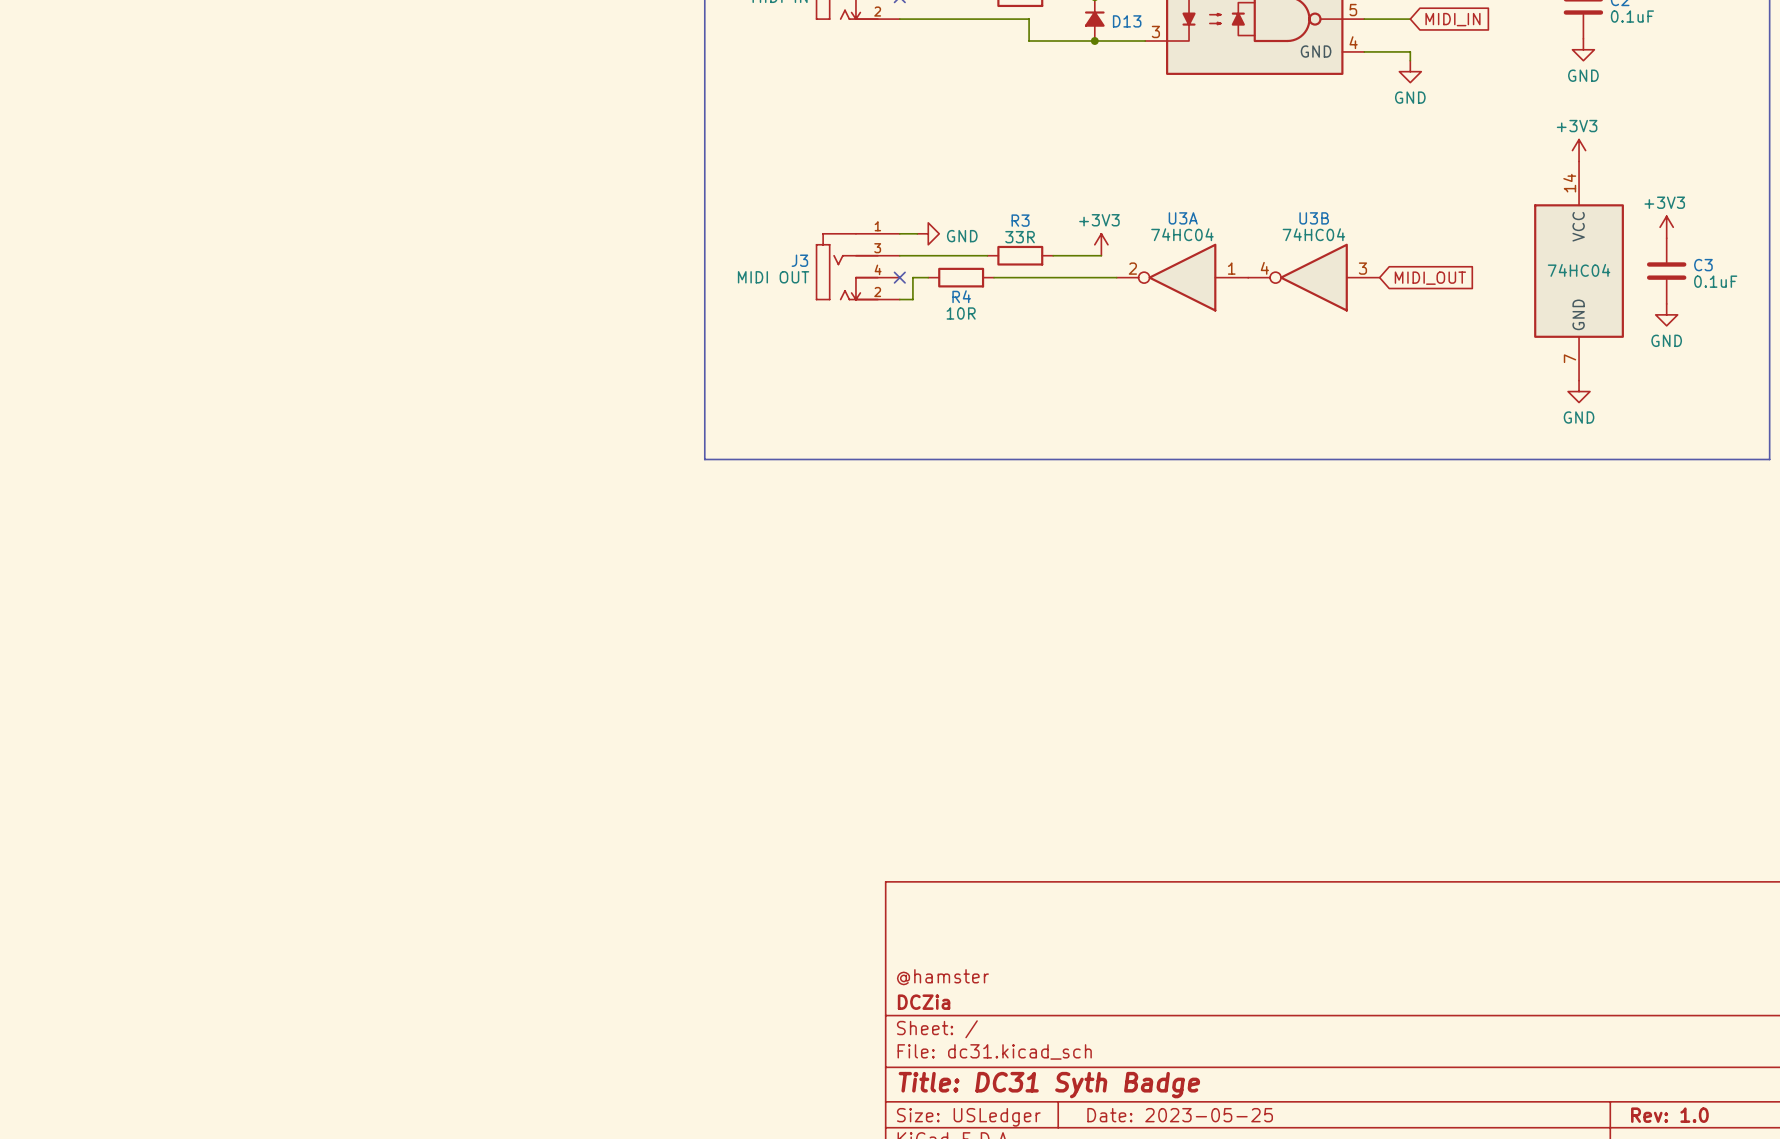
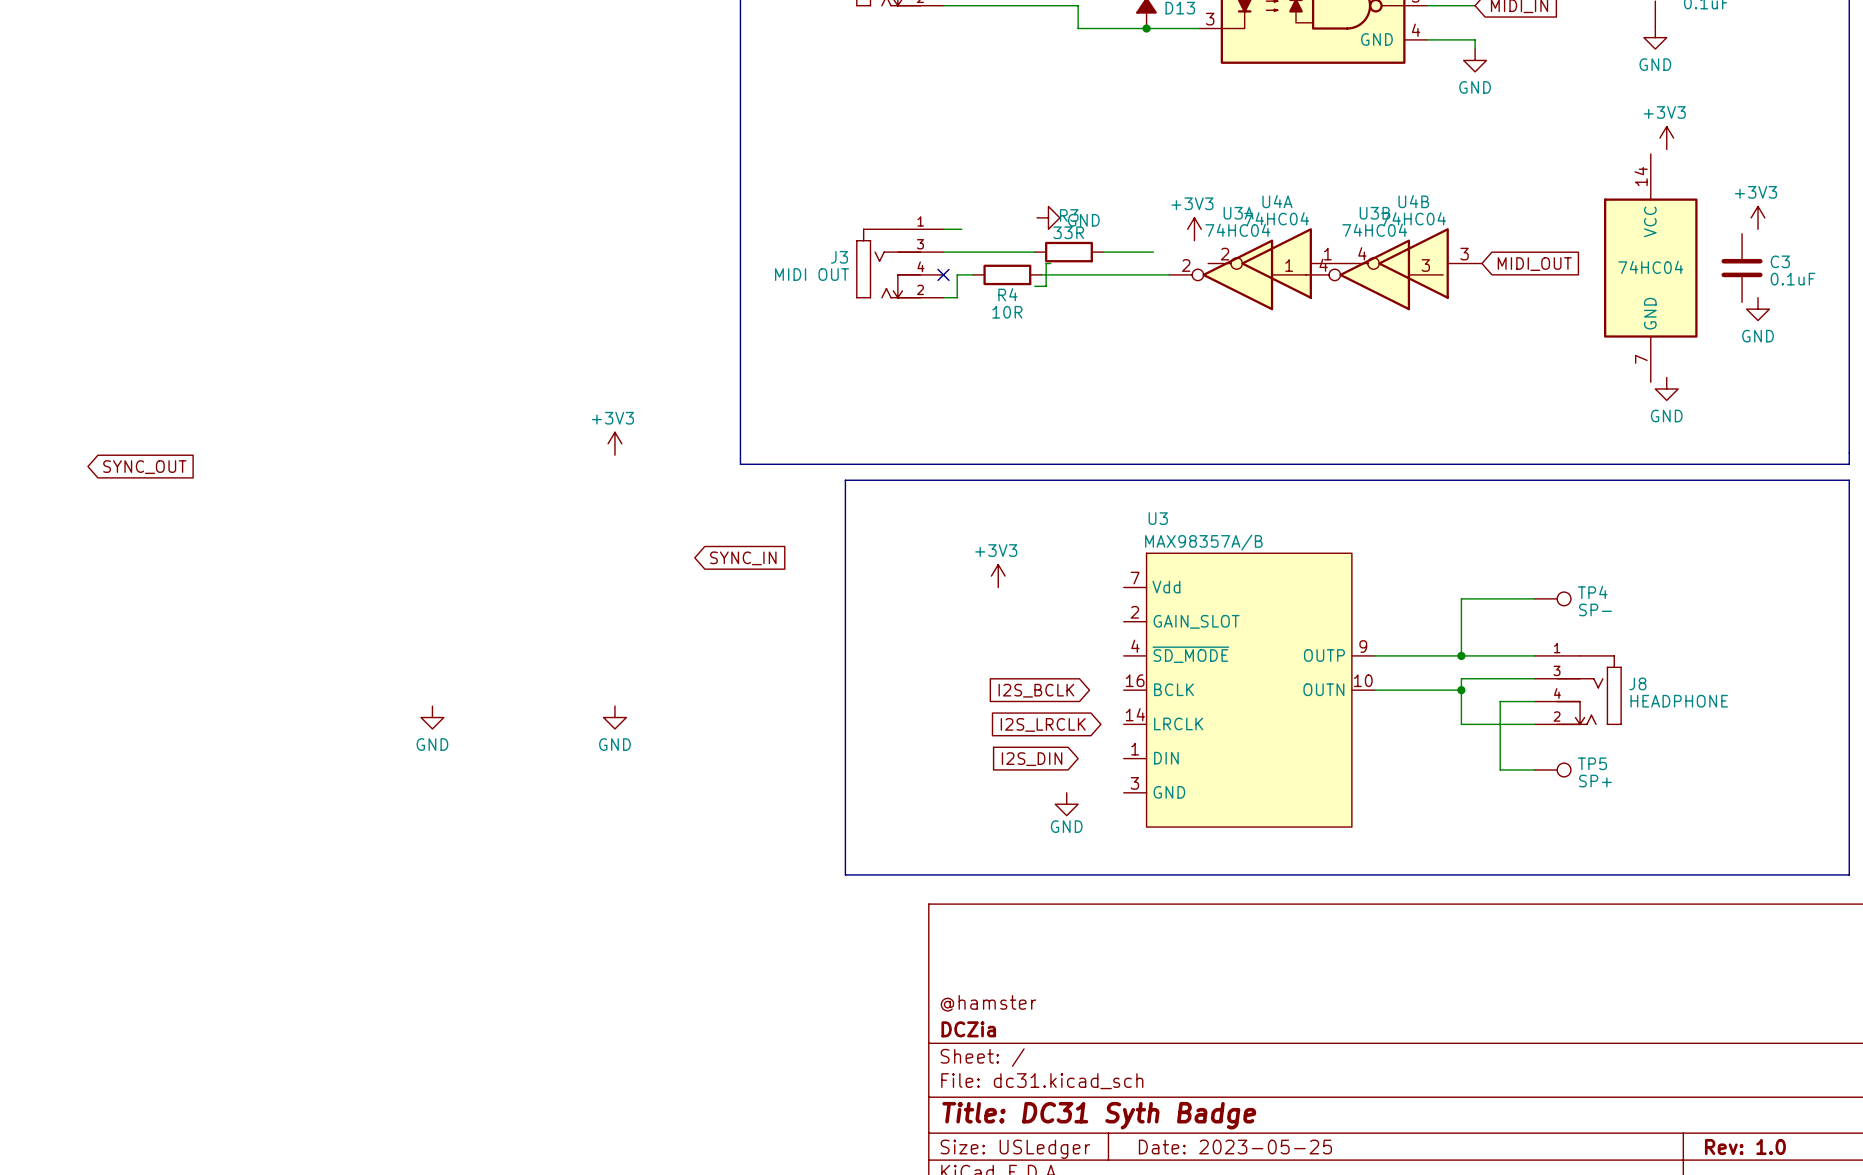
power symbol position: +3V3 (1579, 150) -> +3V3 (1666, 138)
power symbol position: +3V3 (1666, 227) -> +3V3 (1758, 217)
power symbol position: GND (928, 233) -> GND (1048, 217)
power symbol position: +3V3 (1101, 244) -> +3V3 (1194, 229)
wire: none -> (1050, 263) (1046, 263) (1046, 286) (1034, 286)
U4A: none -> 74HC04 (1276, 263)
U4B: none -> 74HC04 (1413, 263)
global label position: MIDI_OUT (1430, 278) -> MIDI_OUT (1534, 264)
power symbol position: GND (1666, 314) -> GND (1758, 309)
power symbol position: GND (1579, 391) -> GND (1666, 388)
power symbol: none -> +3V3 (614, 443)
global label: none -> SYNC_OUT (144, 467)
line: none -> (845, 480) (1849, 480) (1849, 874) (845, 874) (845, 480)
global label: none -> SYNC_IN (743, 558)
power symbol: none -> +3V3 (998, 576)
wire: none -> (1534, 598) (1461, 598) (1461, 655)
TP4: none -> SP- (1552, 598)
wire: none -> (1374, 655) (1534, 655)
junction: none -> (1461, 655)
wire: none -> (1534, 678) (1461, 678) (1461, 724) (1534, 724)
global label: none -> I2S_BCLK (1036, 690)
U3: none -> MAX98357A/B (1249, 690)
wire: none -> (1374, 690) (1461, 690)
junction: none -> (1461, 690)
J8: none -> HEADPHONE (1578, 690)
wire: none -> (1534, 701) (1500, 701) (1500, 770) (1534, 770)
power symbol: none -> GND (432, 717)
power symbol: none -> GND (614, 717)
global label: none -> I2S_LRCLK (1043, 724)
global label: none -> I2S_DIN (1032, 759)
TP5: none -> SP+ (1552, 770)
power symbol: none -> GND (1066, 804)

